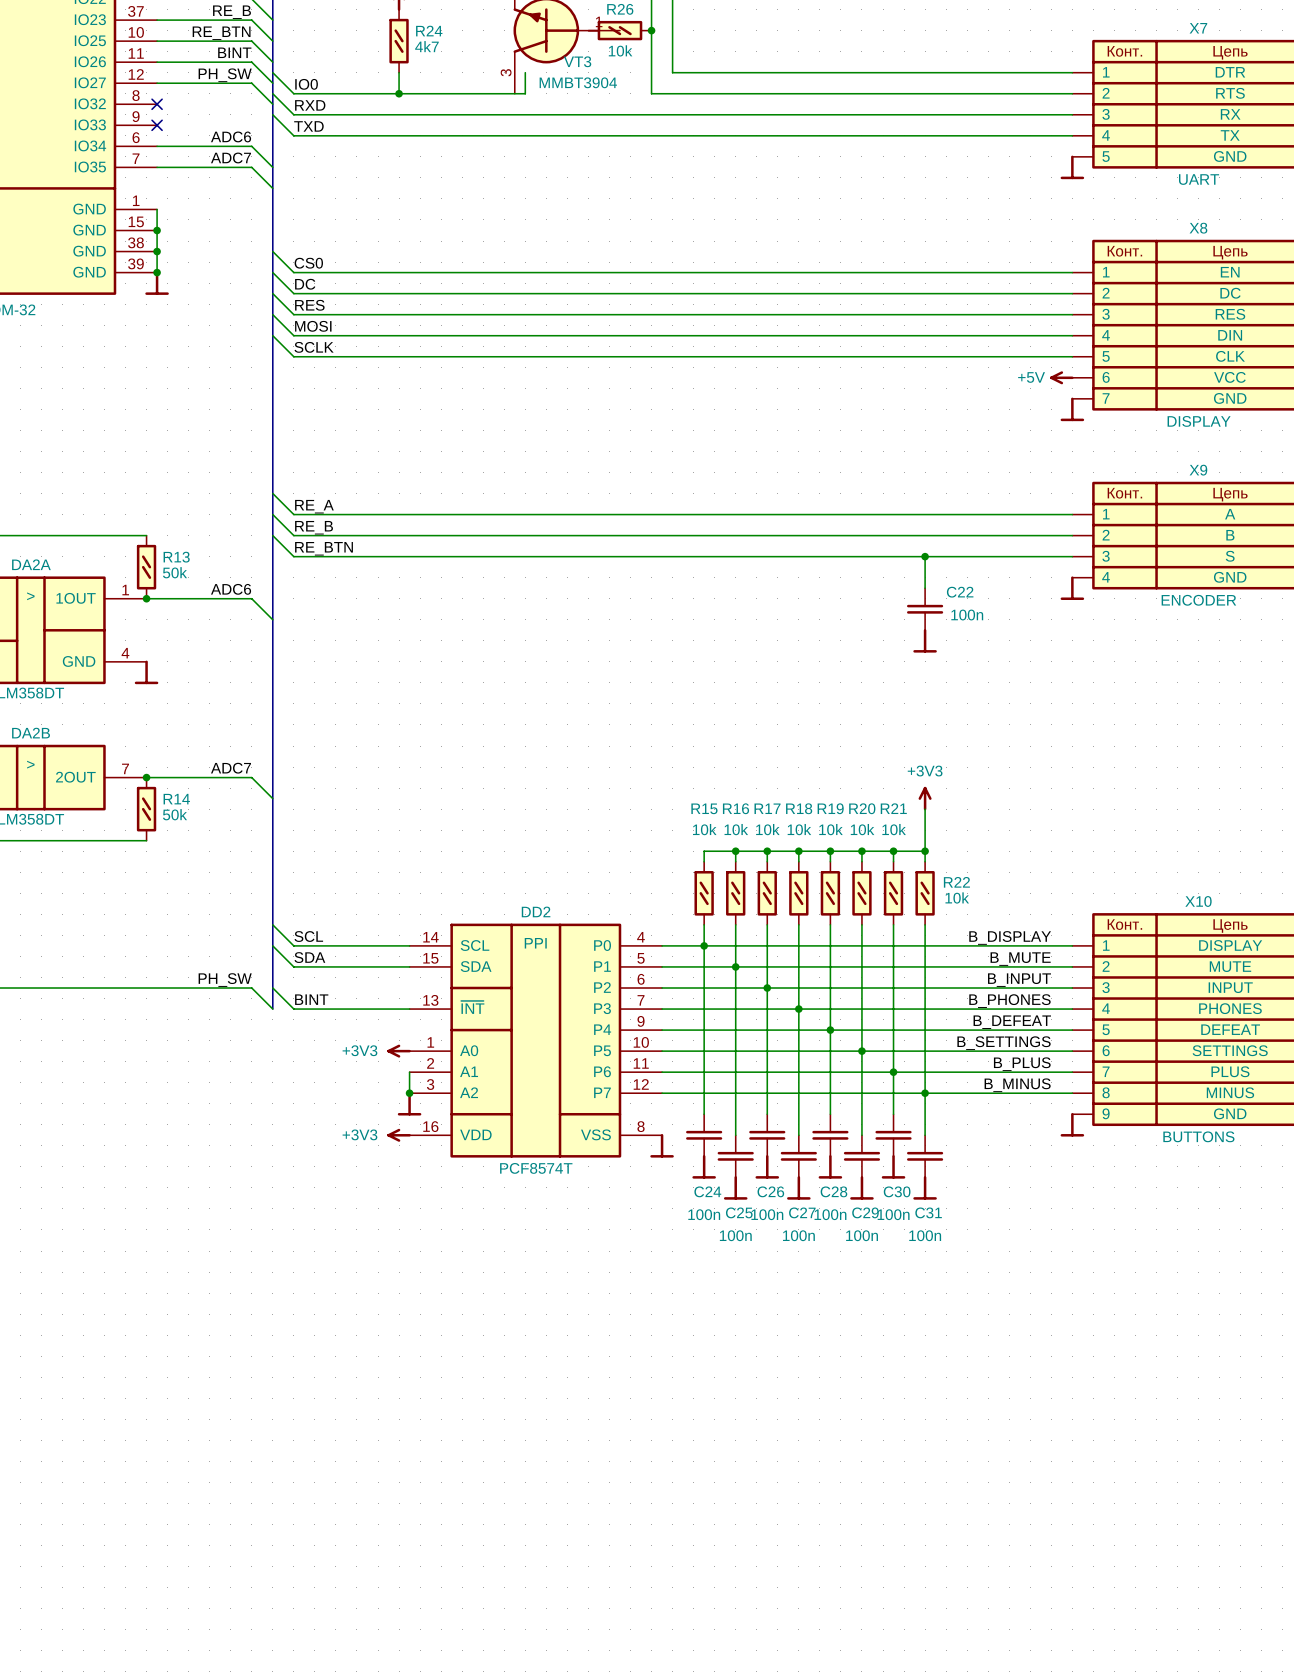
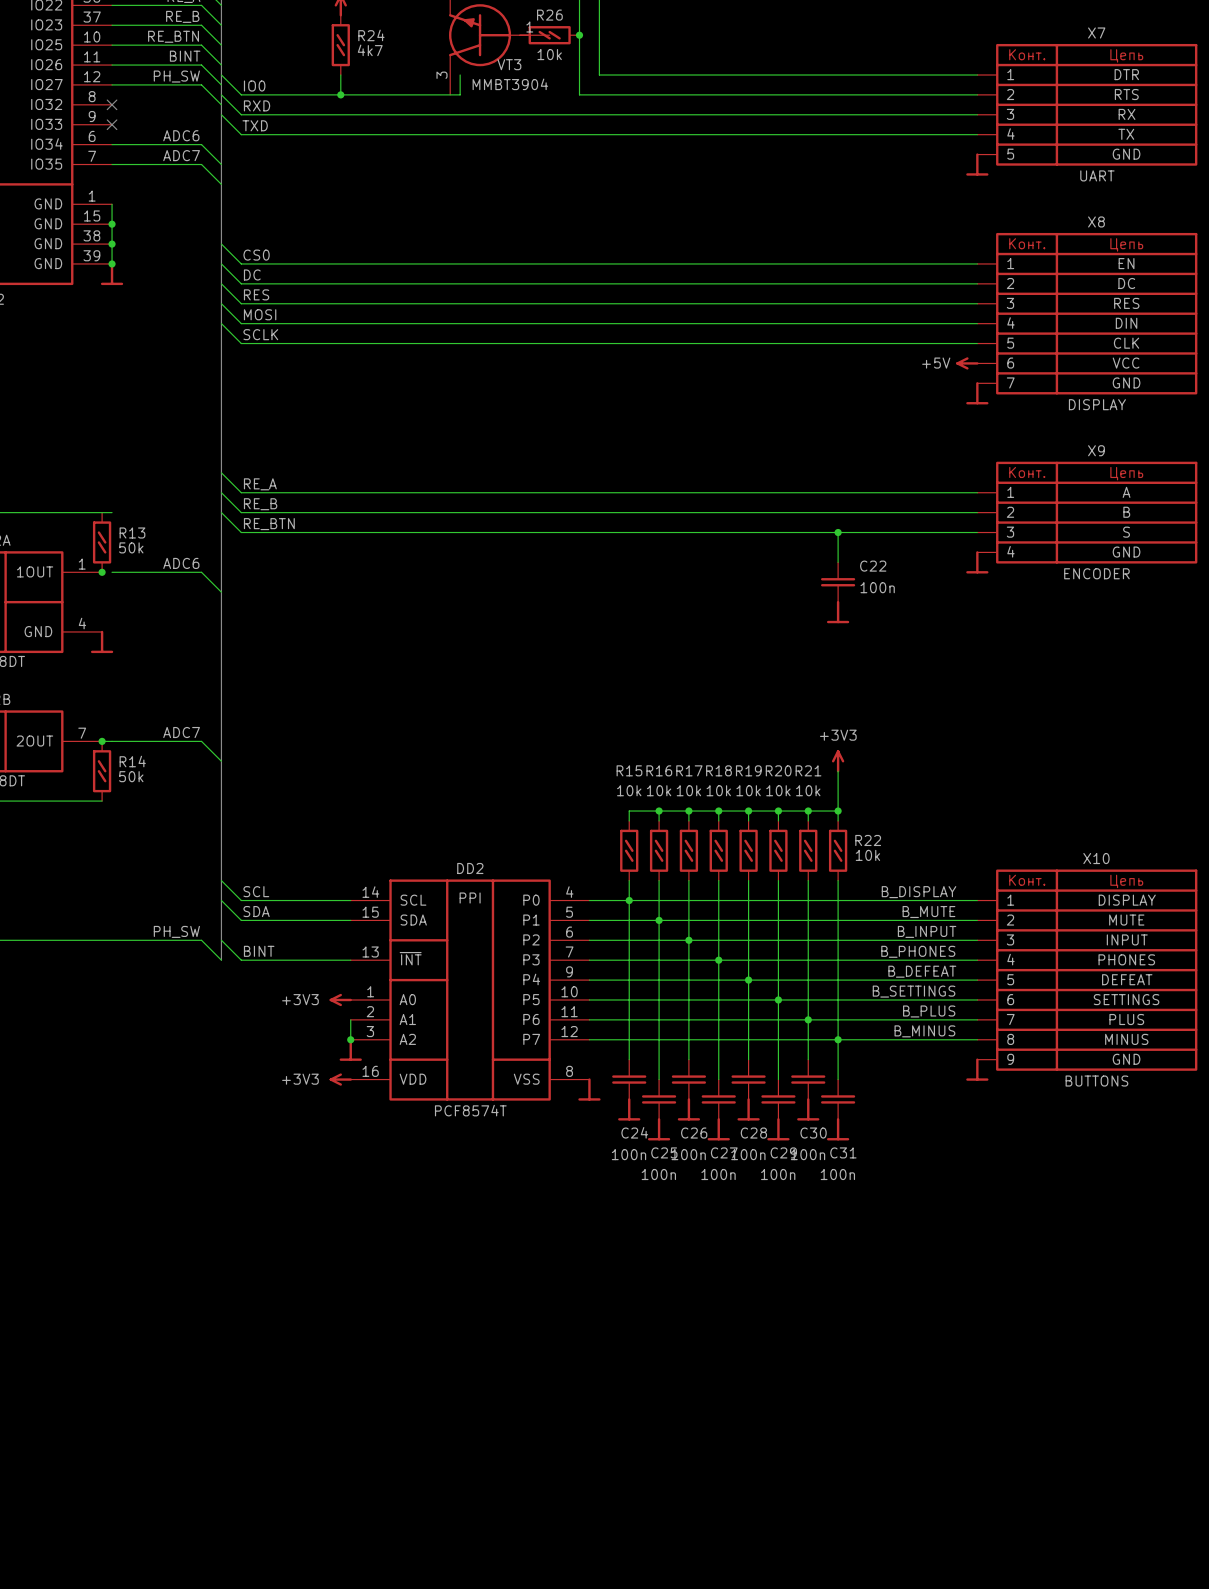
wire: (146, 598) (157, 598) -> (102, 512) (112, 512)

